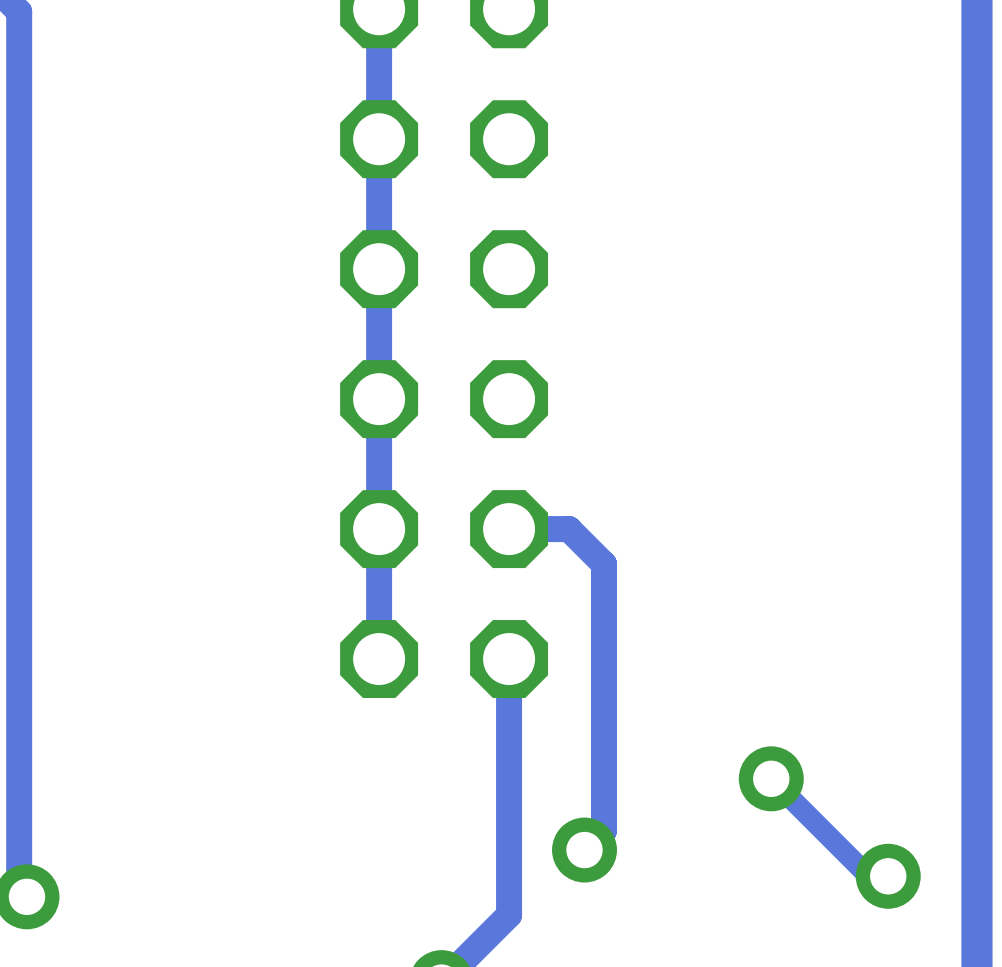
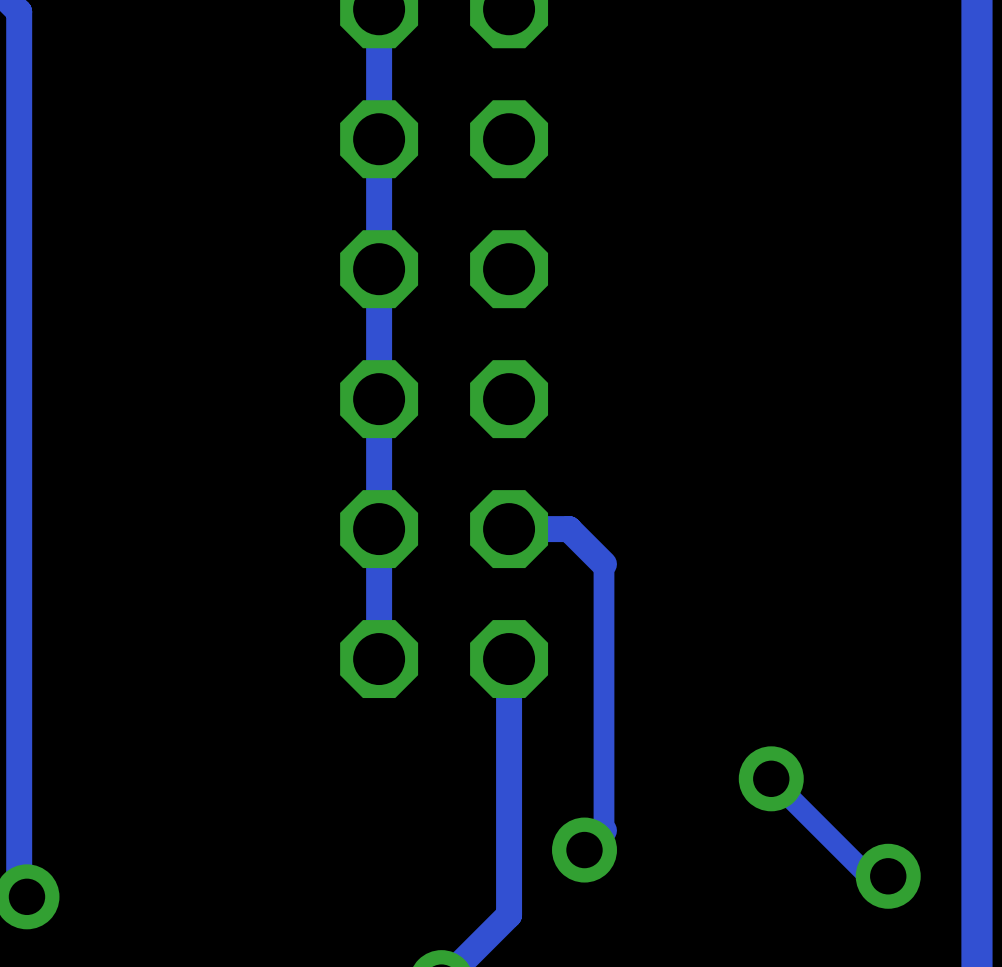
track width: thick (603, 564) (603, 830) -> thin (603, 564) (603, 830)

